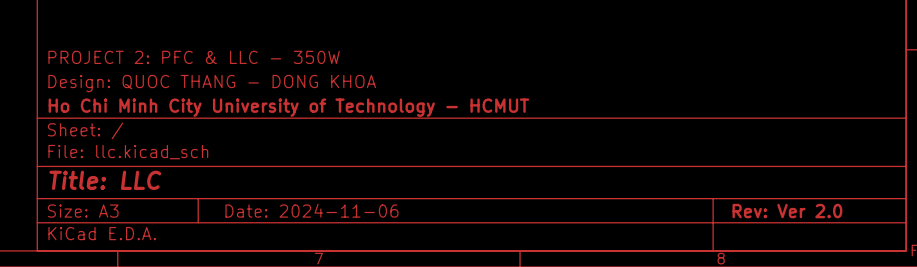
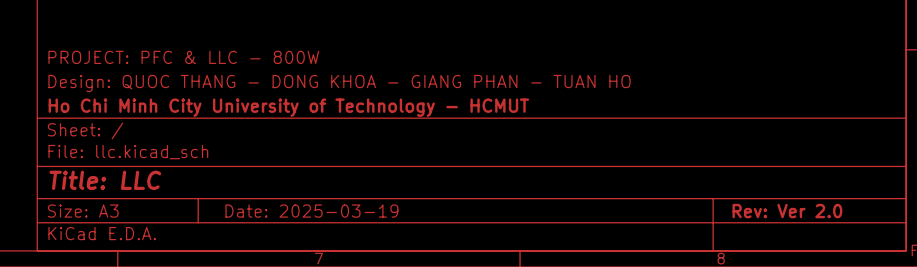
title block: PROJECT 2: PFC & LLC - 350W (194, 57) -> PROJECT: PFC & LLC - 800W (183, 57)
title block: Design: QUOC THANG - DONG KHOA (212, 83) -> Design: QUOC THANG - DONG KHOA - GIANG PHAN - TUAN HO (339, 83)
title block: Date: 2024-11-06 (311, 210) -> Date: 2025-03-19 (311, 211)

